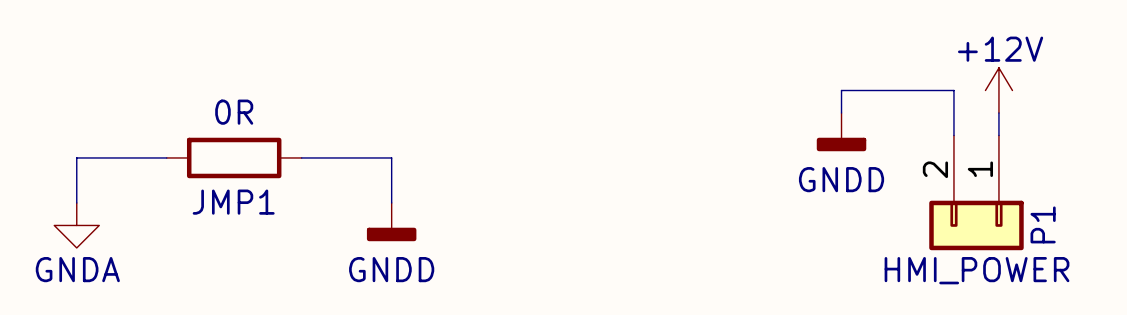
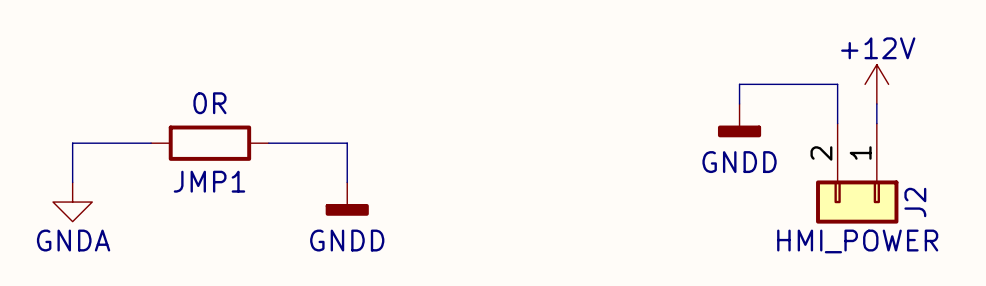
P1 name: P1 (1043, 224) -> J2 (915, 202)

